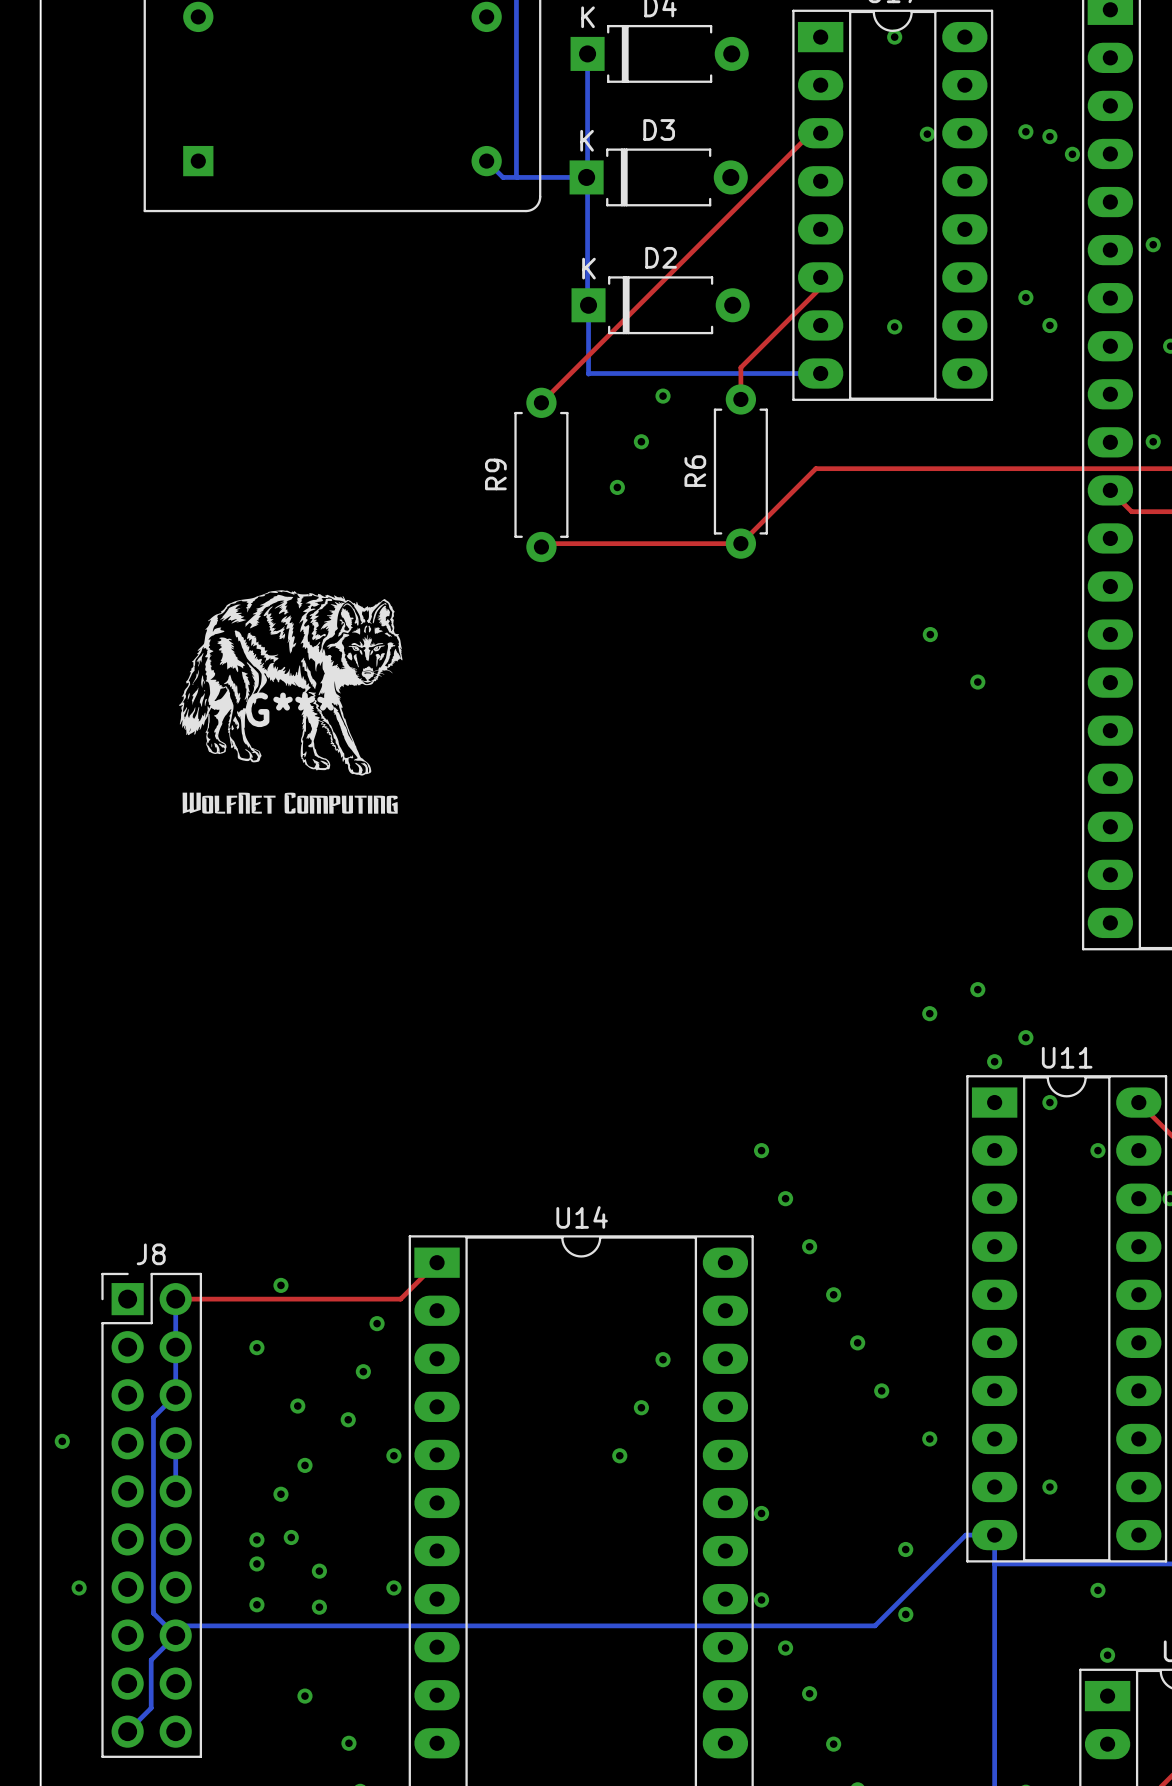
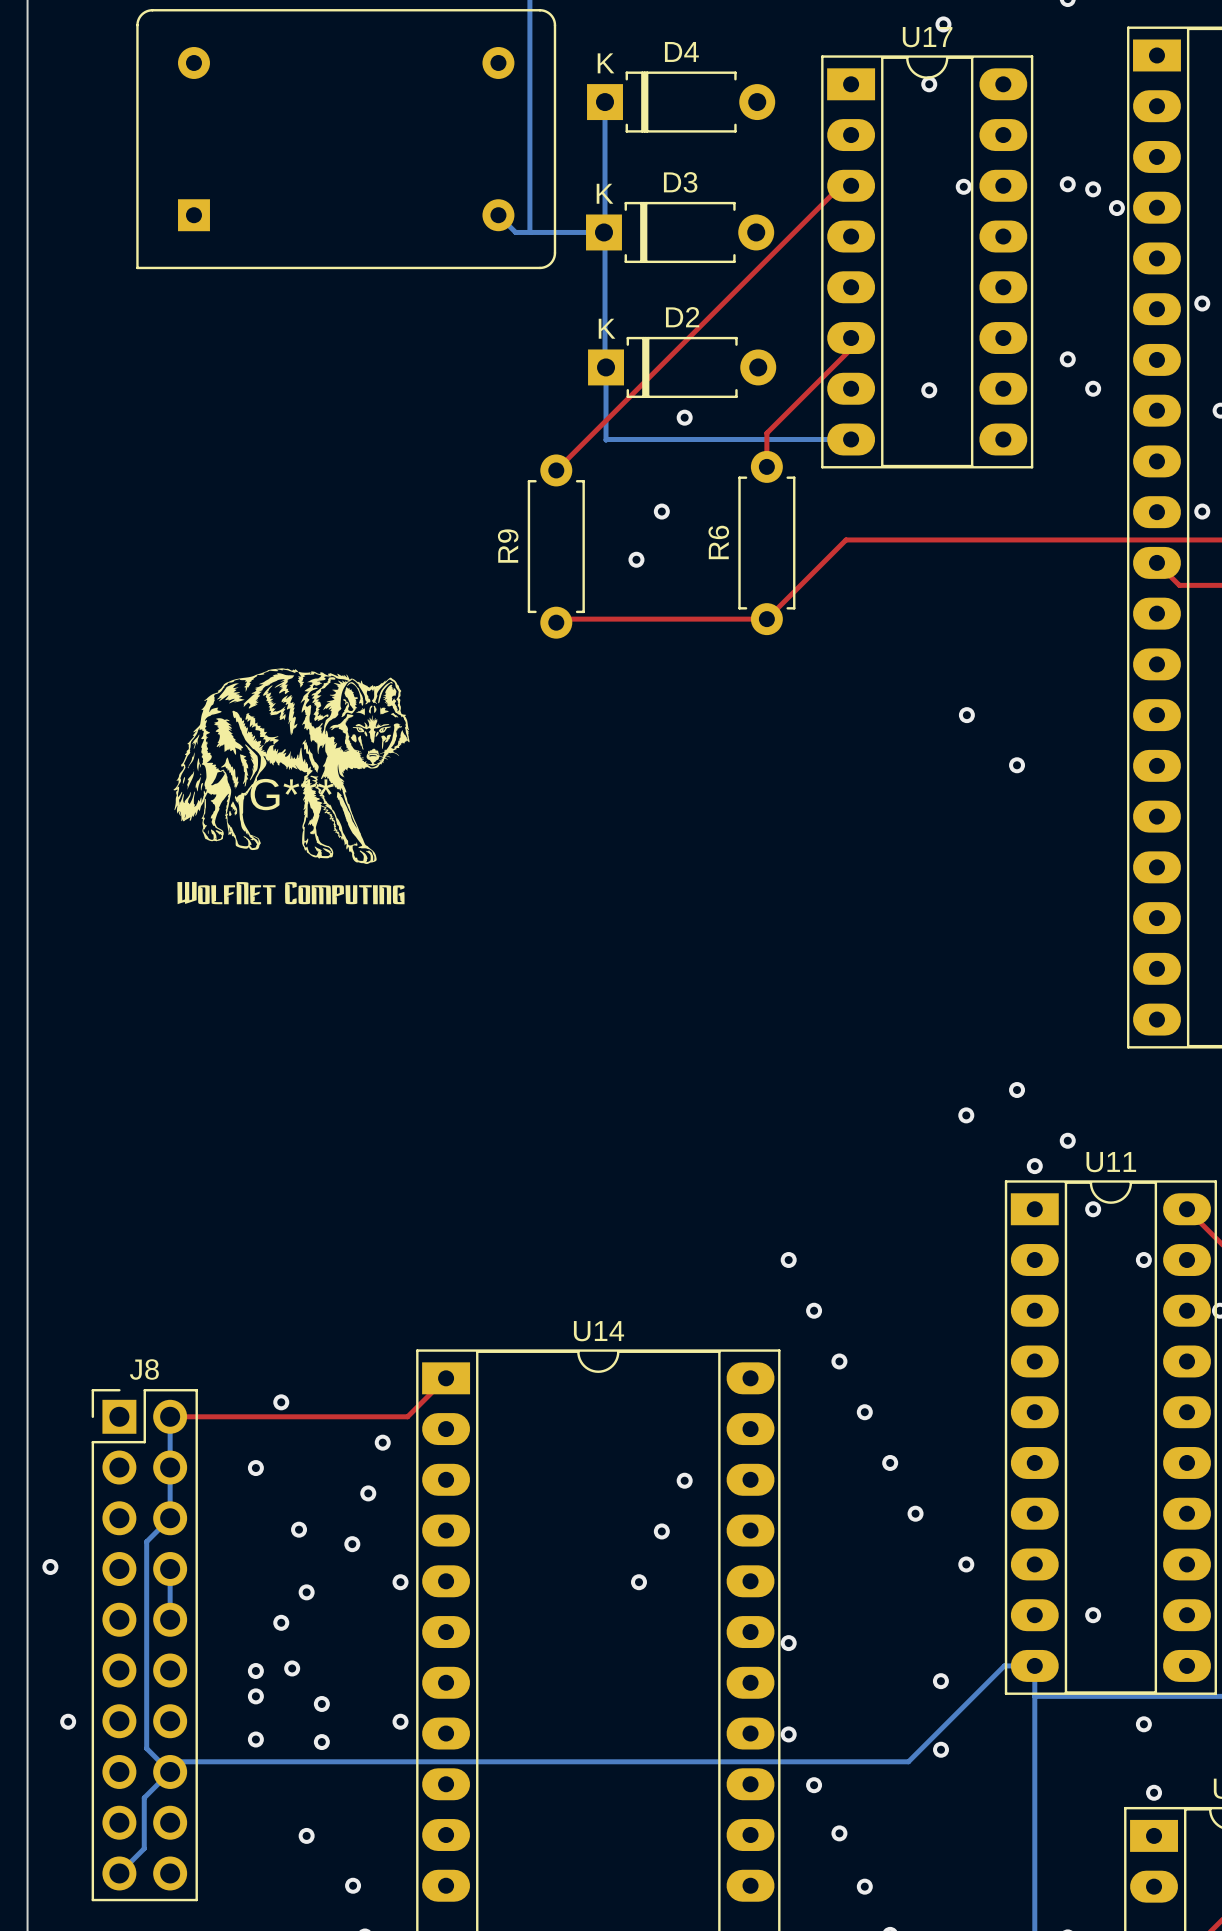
via position: (663, 396) -> (684, 417)

